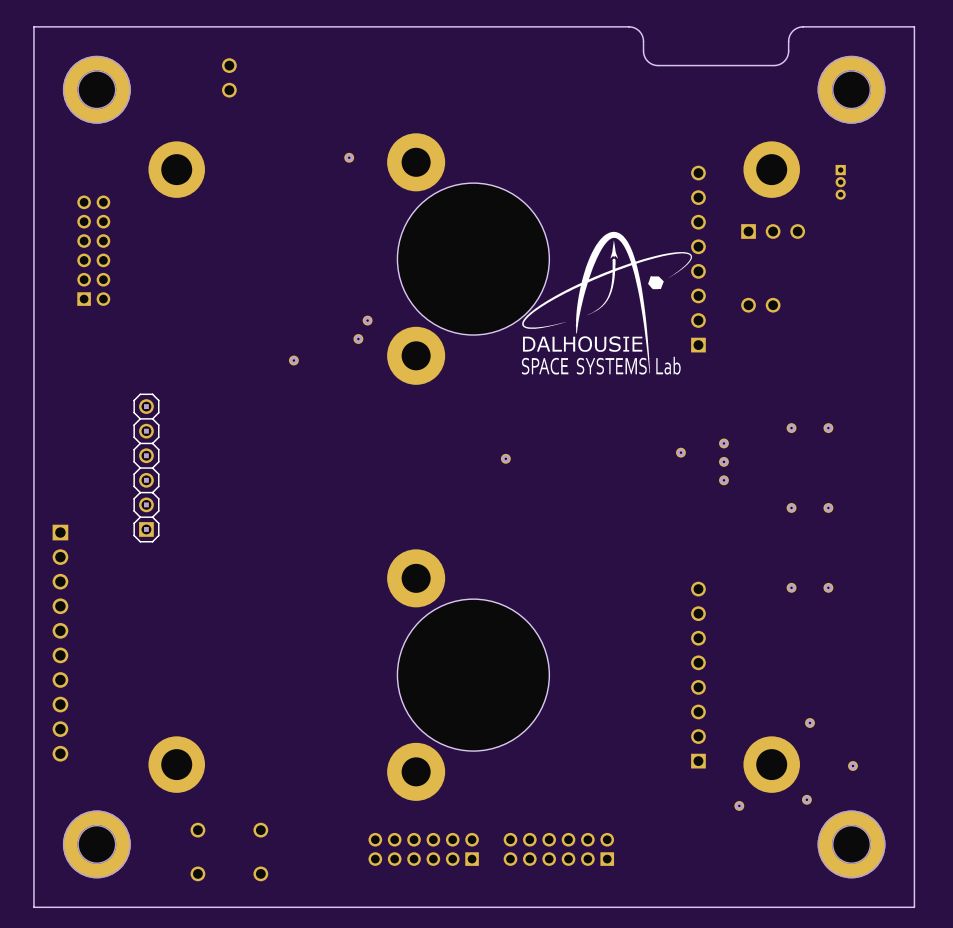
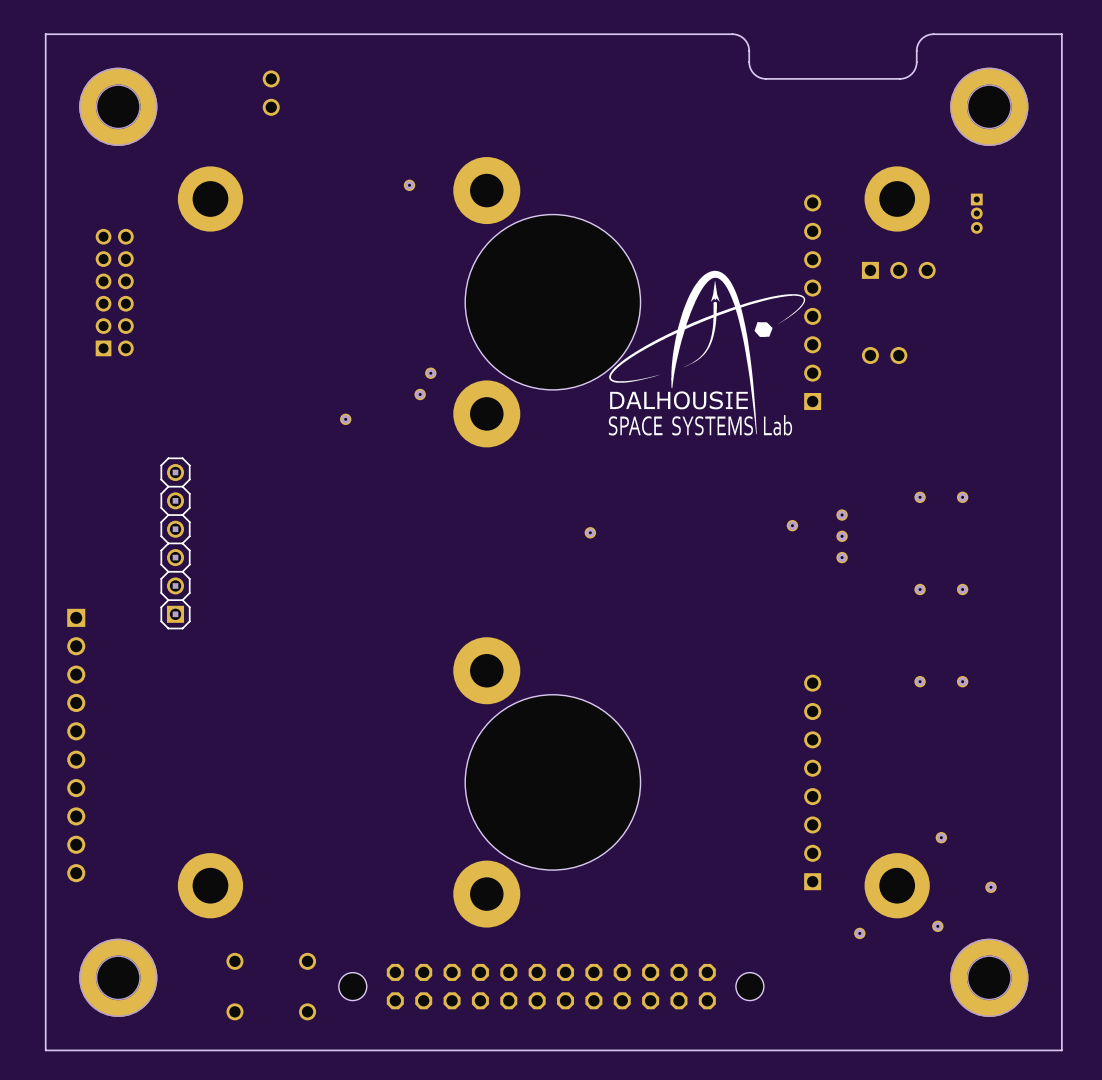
part: (423, 849) -> none
part: (558, 849) -> none
hole: none -> (352, 986)
part: none -> (551, 986)
hole: none -> (749, 986)

